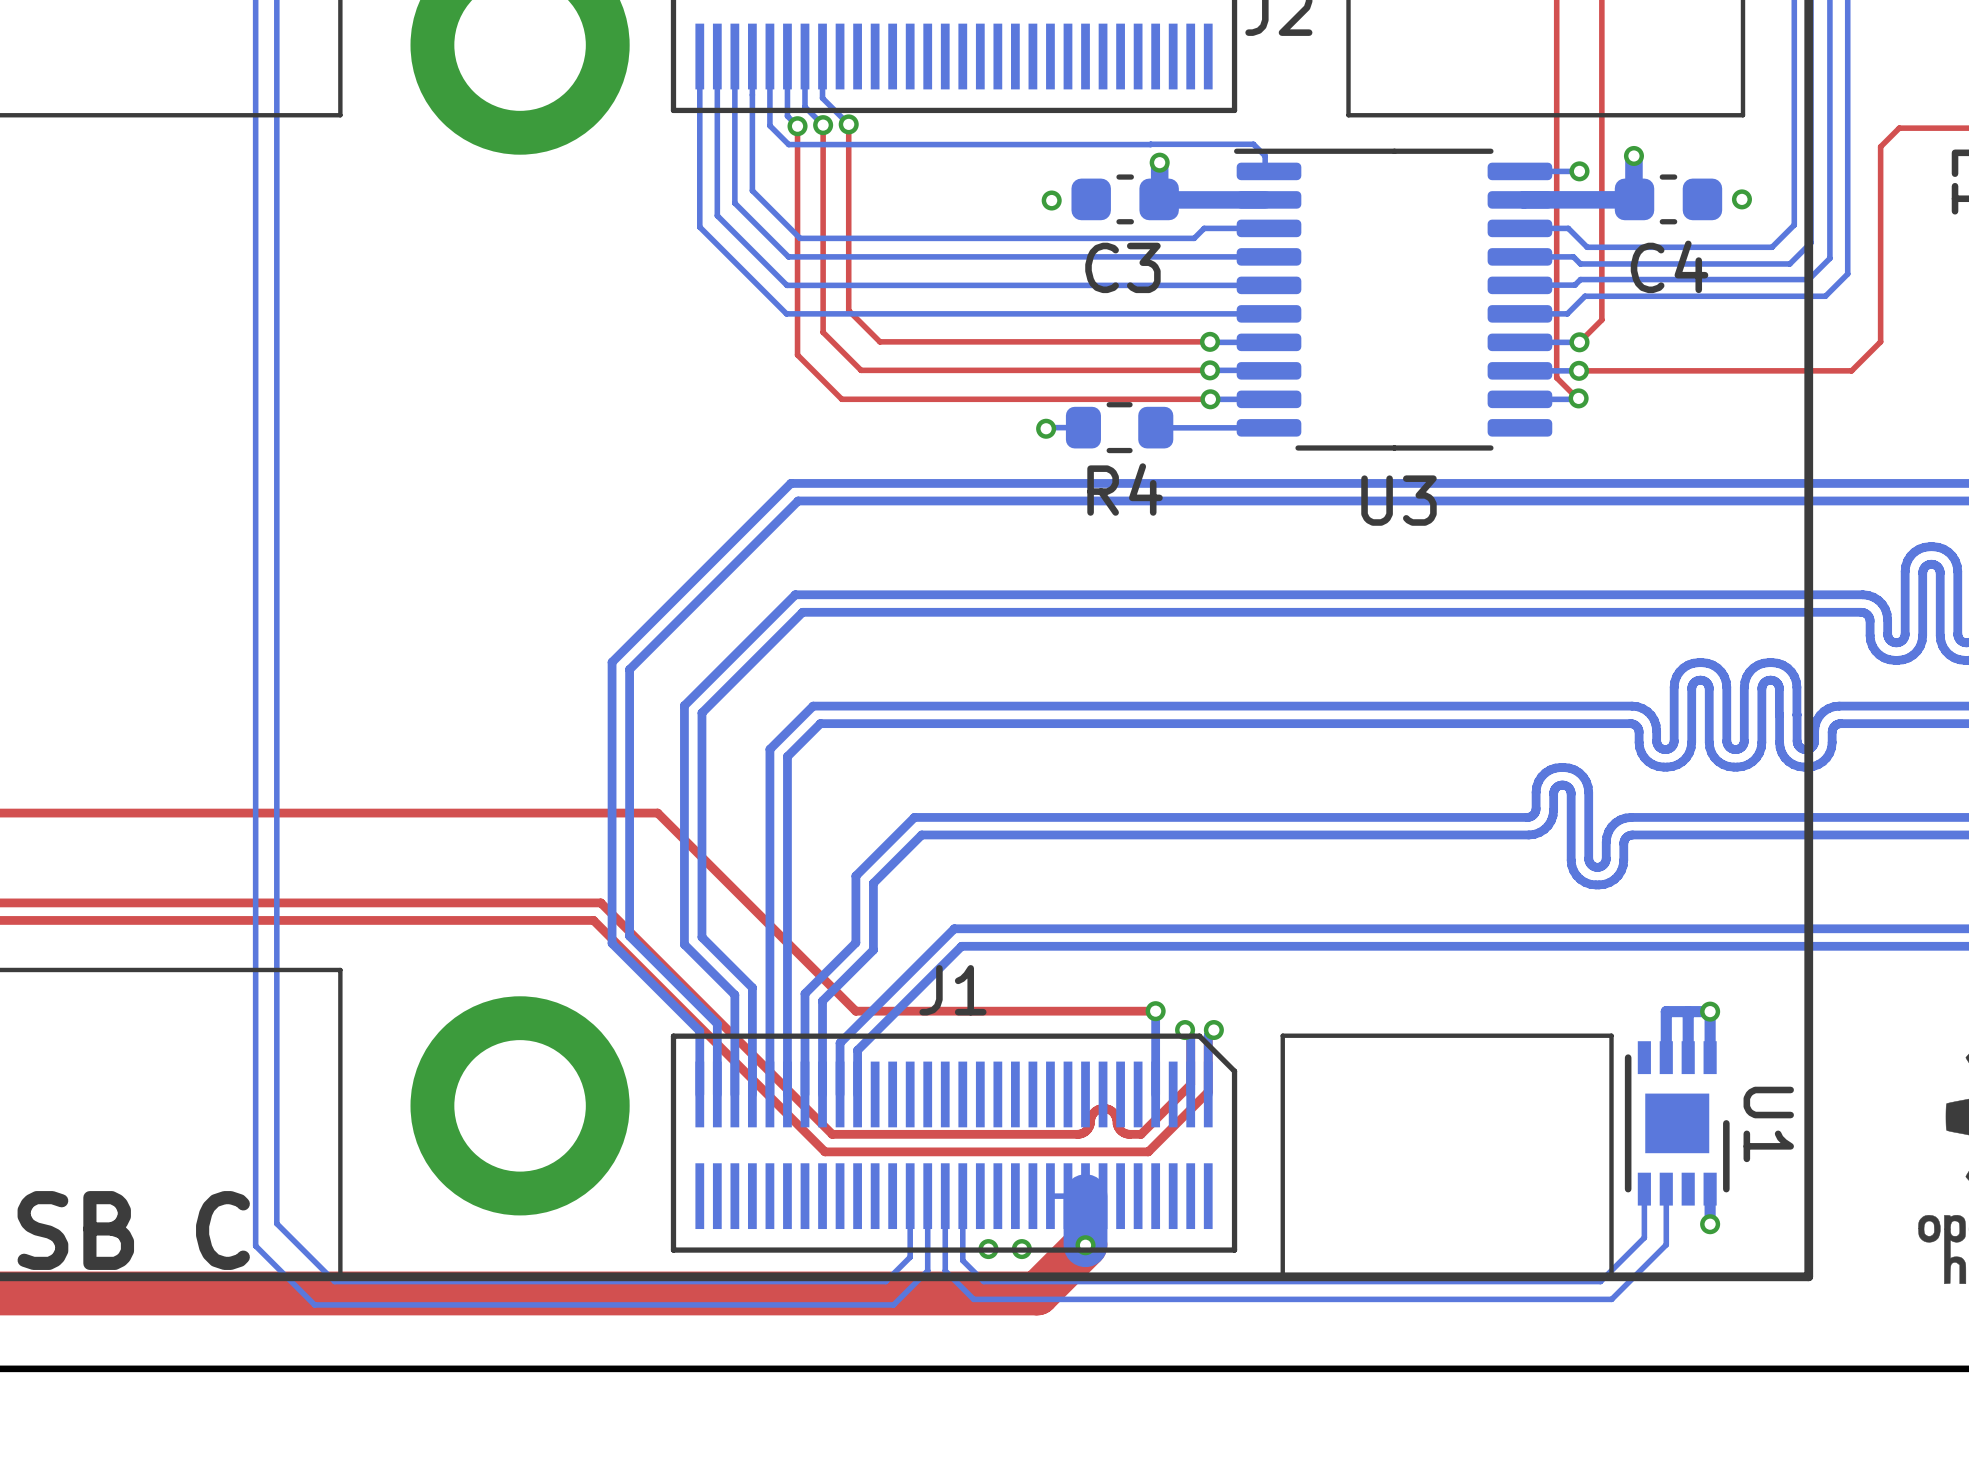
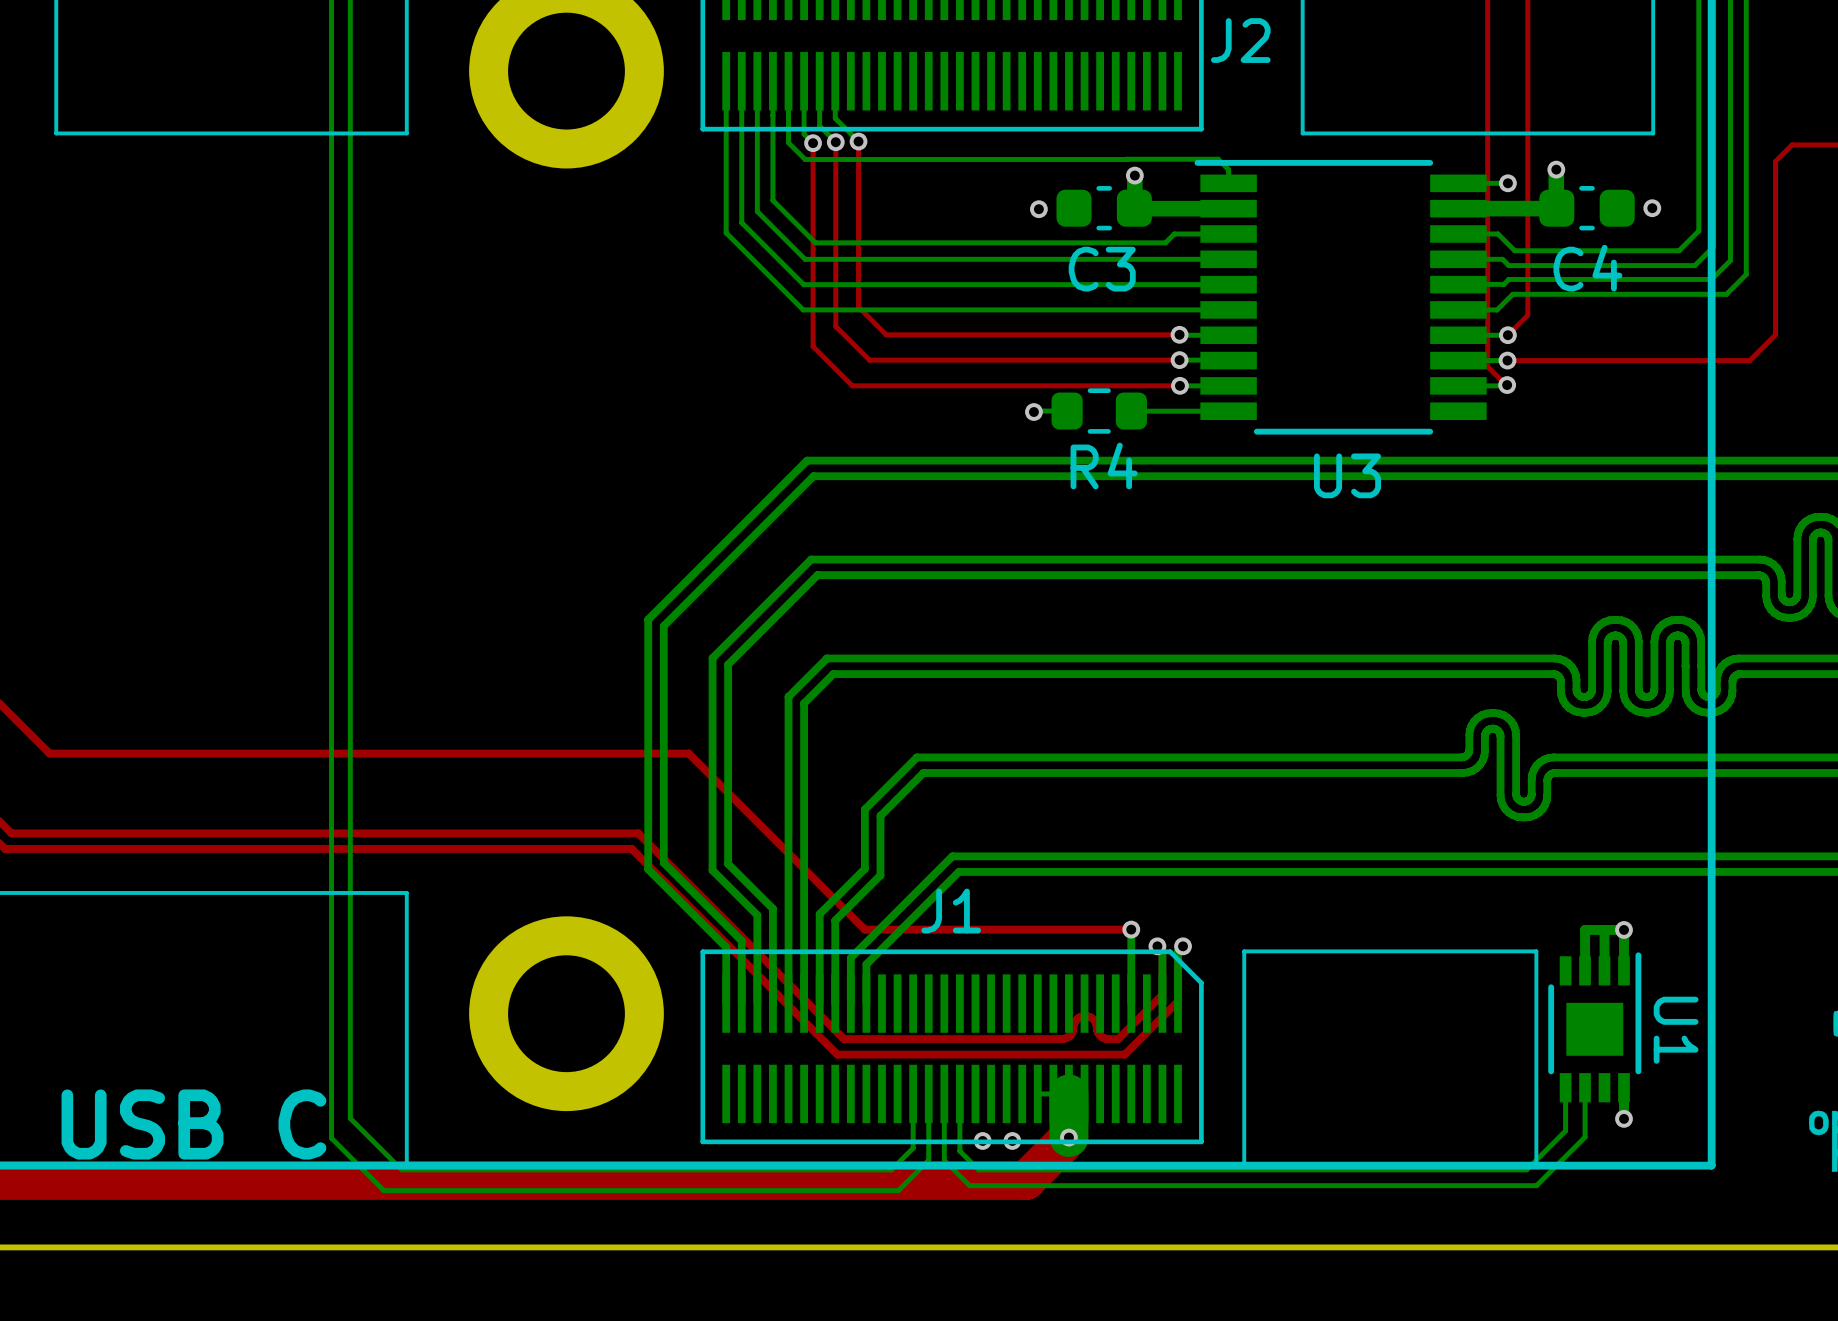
U3 footprint: [1234, 148, 1553, 451] -> [1194, 159, 1487, 435]
U1 footprint: [1624, 1041, 1730, 1206] -> [1548, 952, 1642, 1103]

